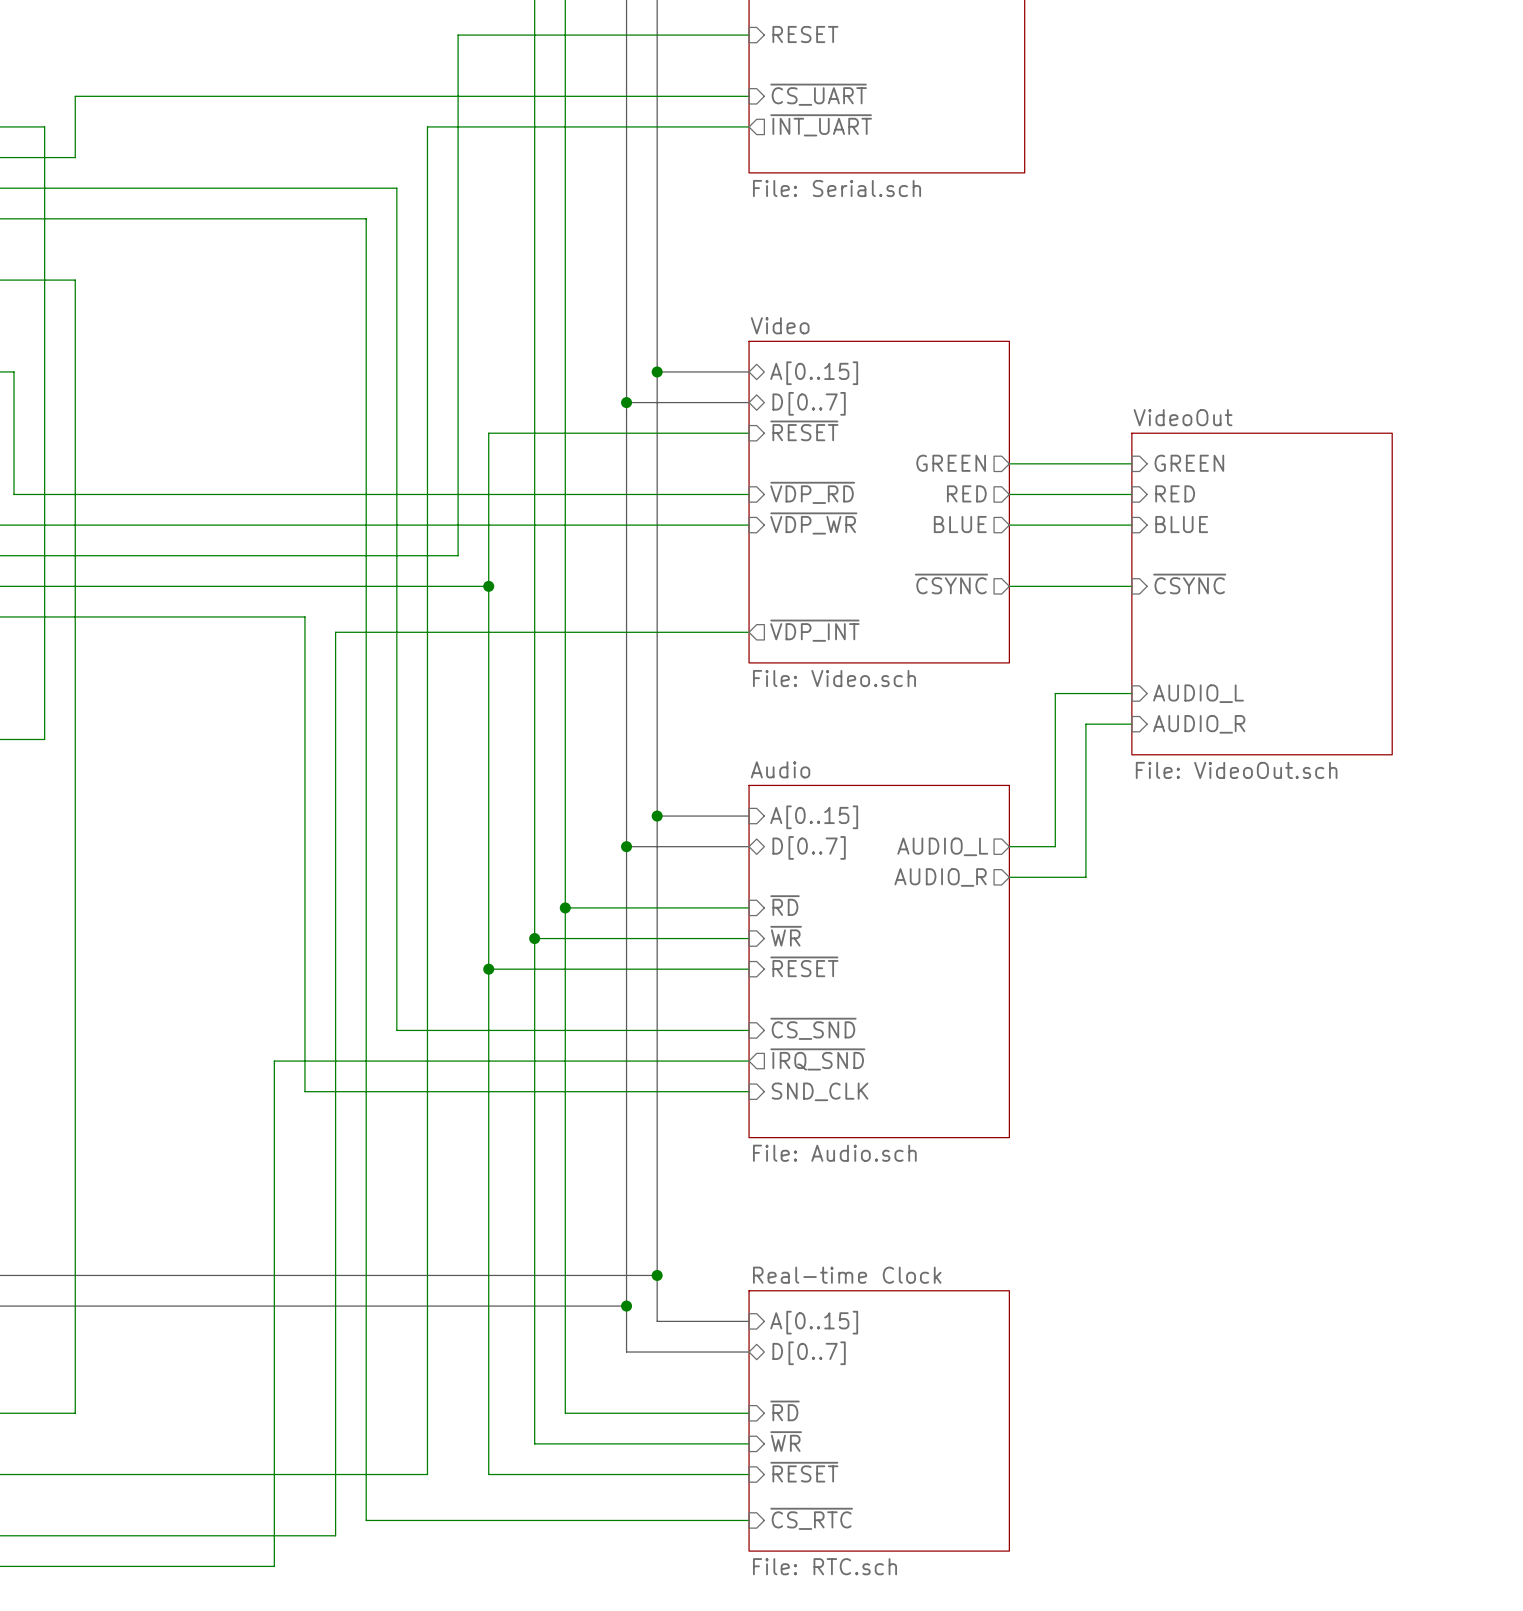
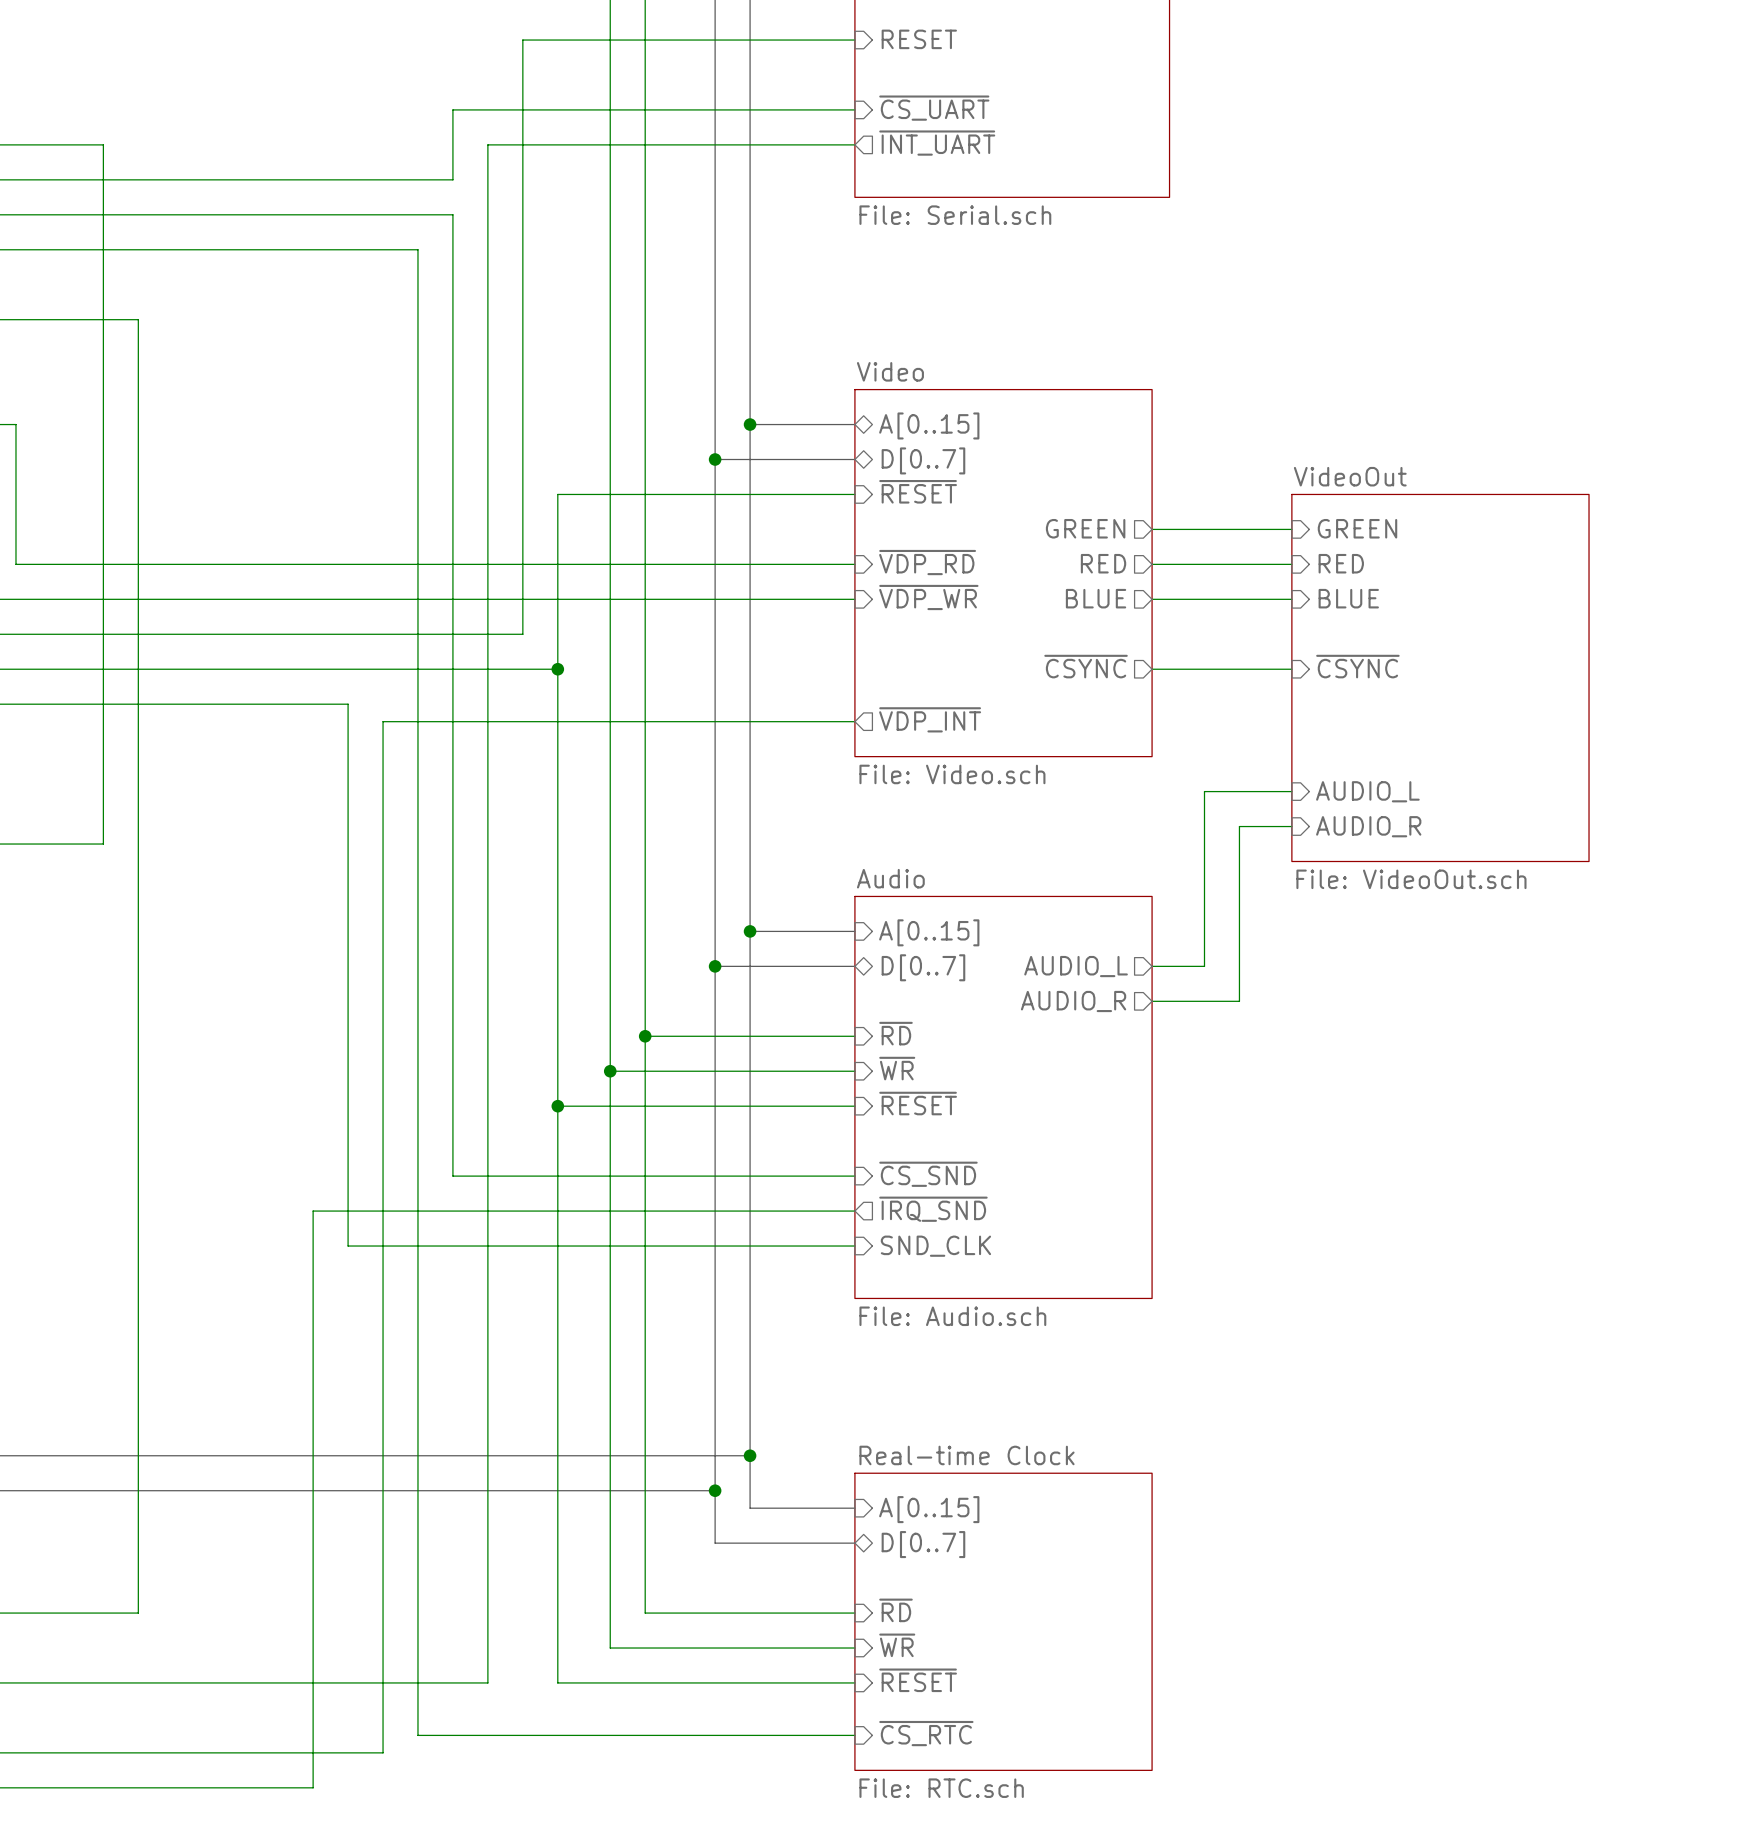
wire: (396, 96) (75, 96) (75, 157) -> (452, 109) (452, 179) (85, 179)
wire: (44, 126) (44, 739) -> (50, 144) (103, 144) (103, 844) (50, 844)
wire: (75, 280) (75, 1413) -> (85, 319) (138, 319) (138, 1613) (85, 1613)

